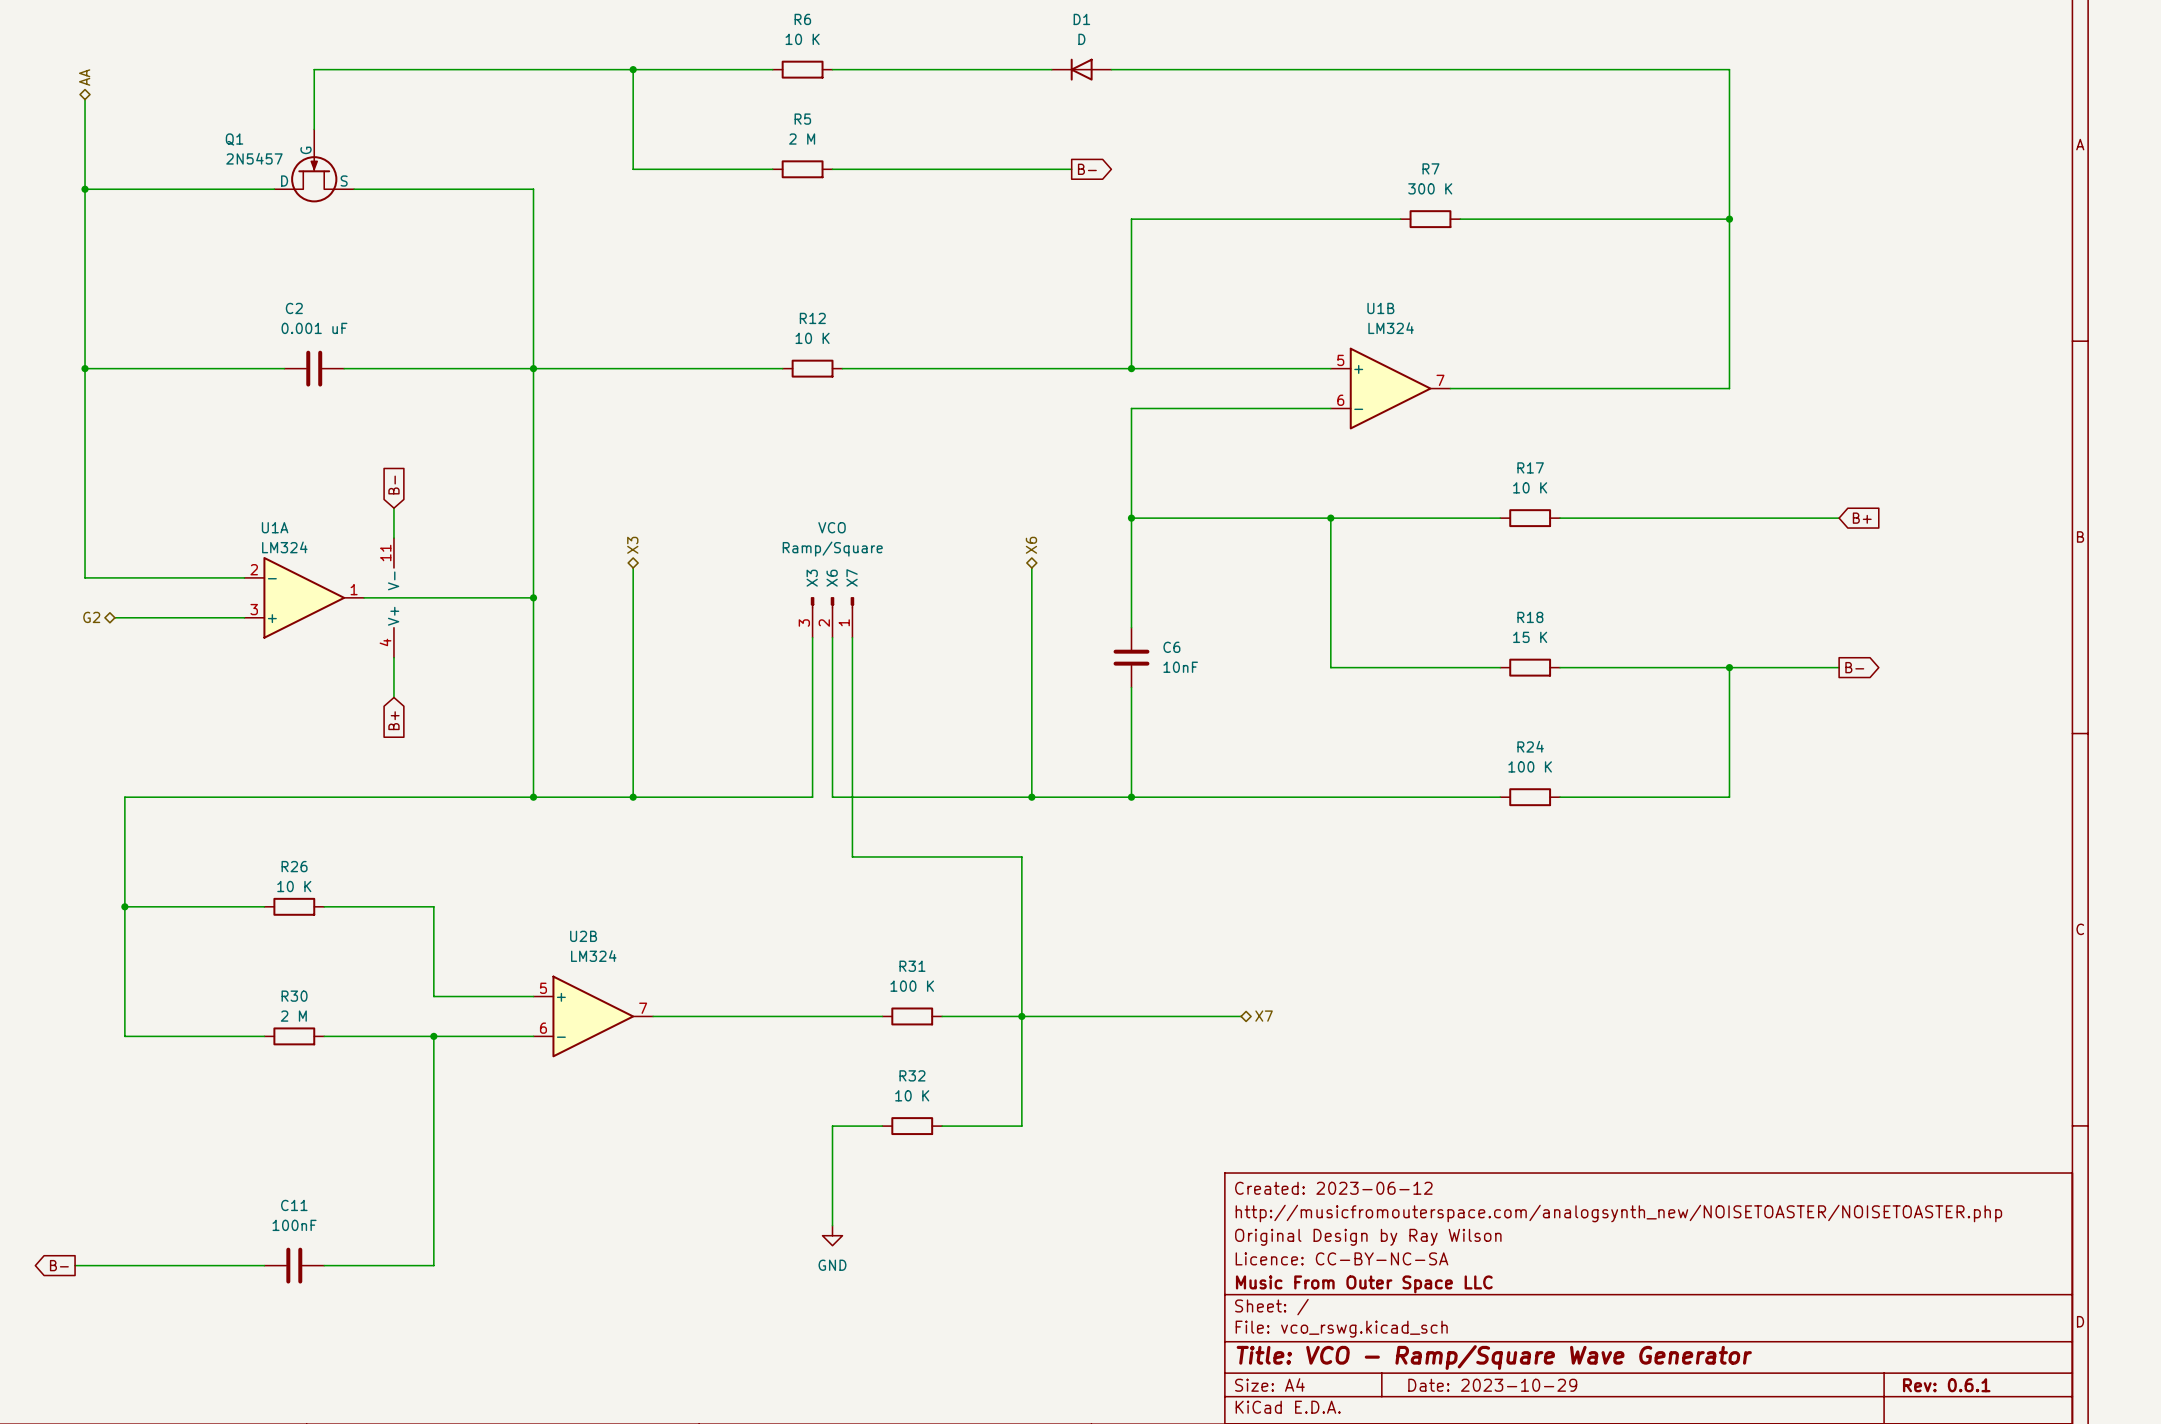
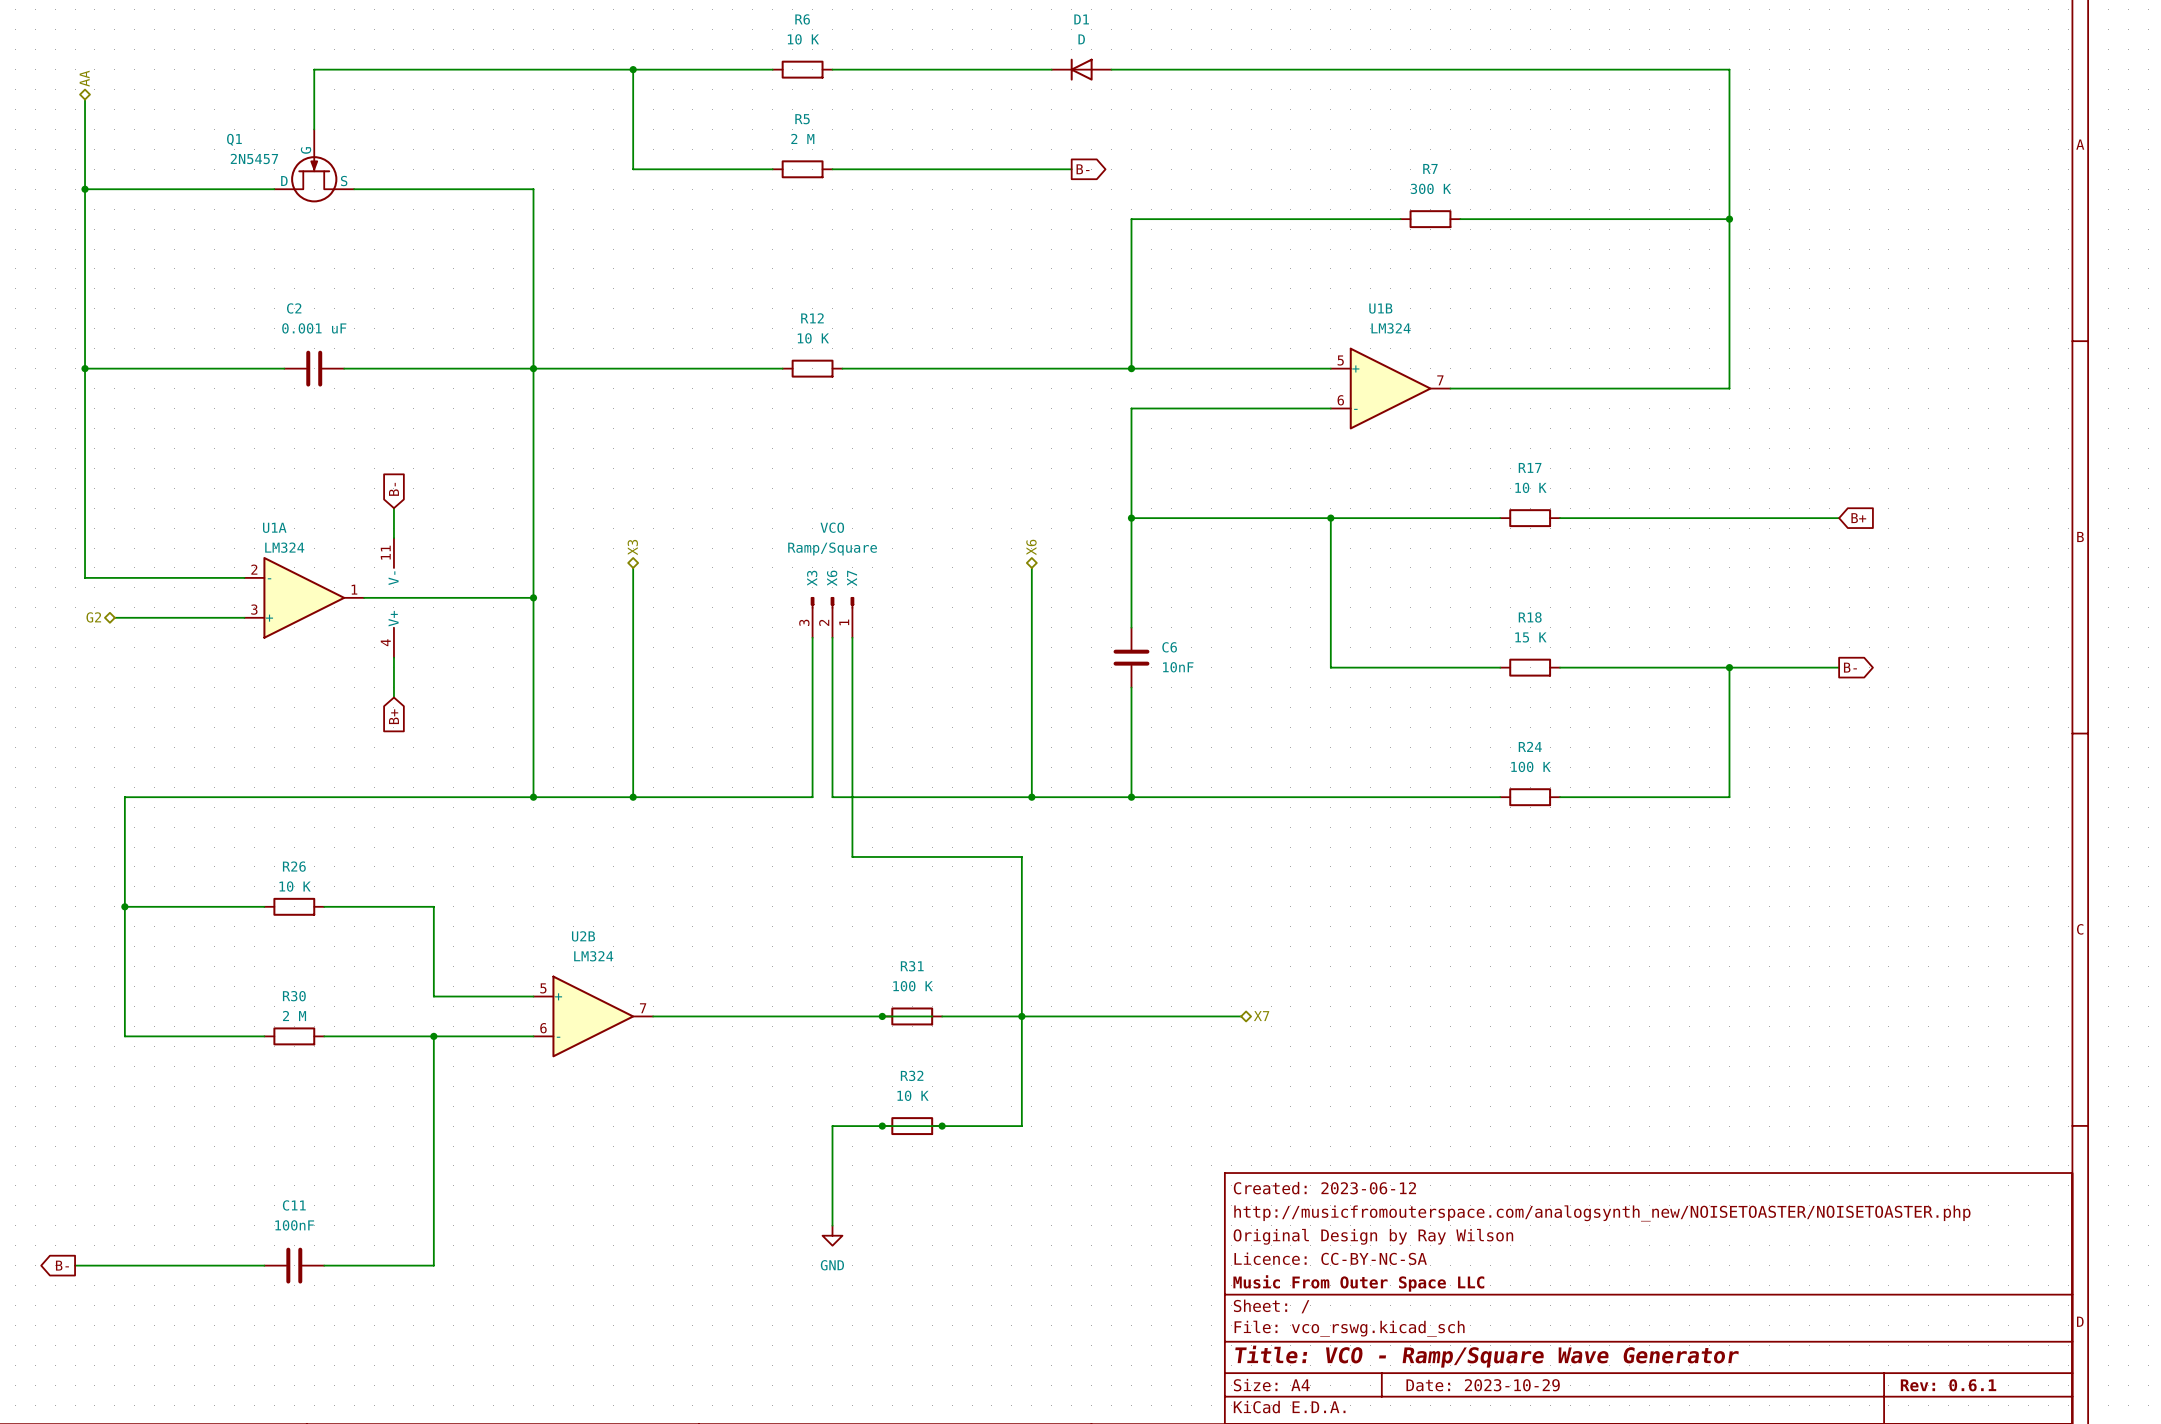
wire: none -> (882, 1016) (932, 1016)
junction: none -> (882, 1016)
wire: none -> (882, 1126) (942, 1126)
junction: none -> (882, 1126)
junction: none -> (942, 1126)

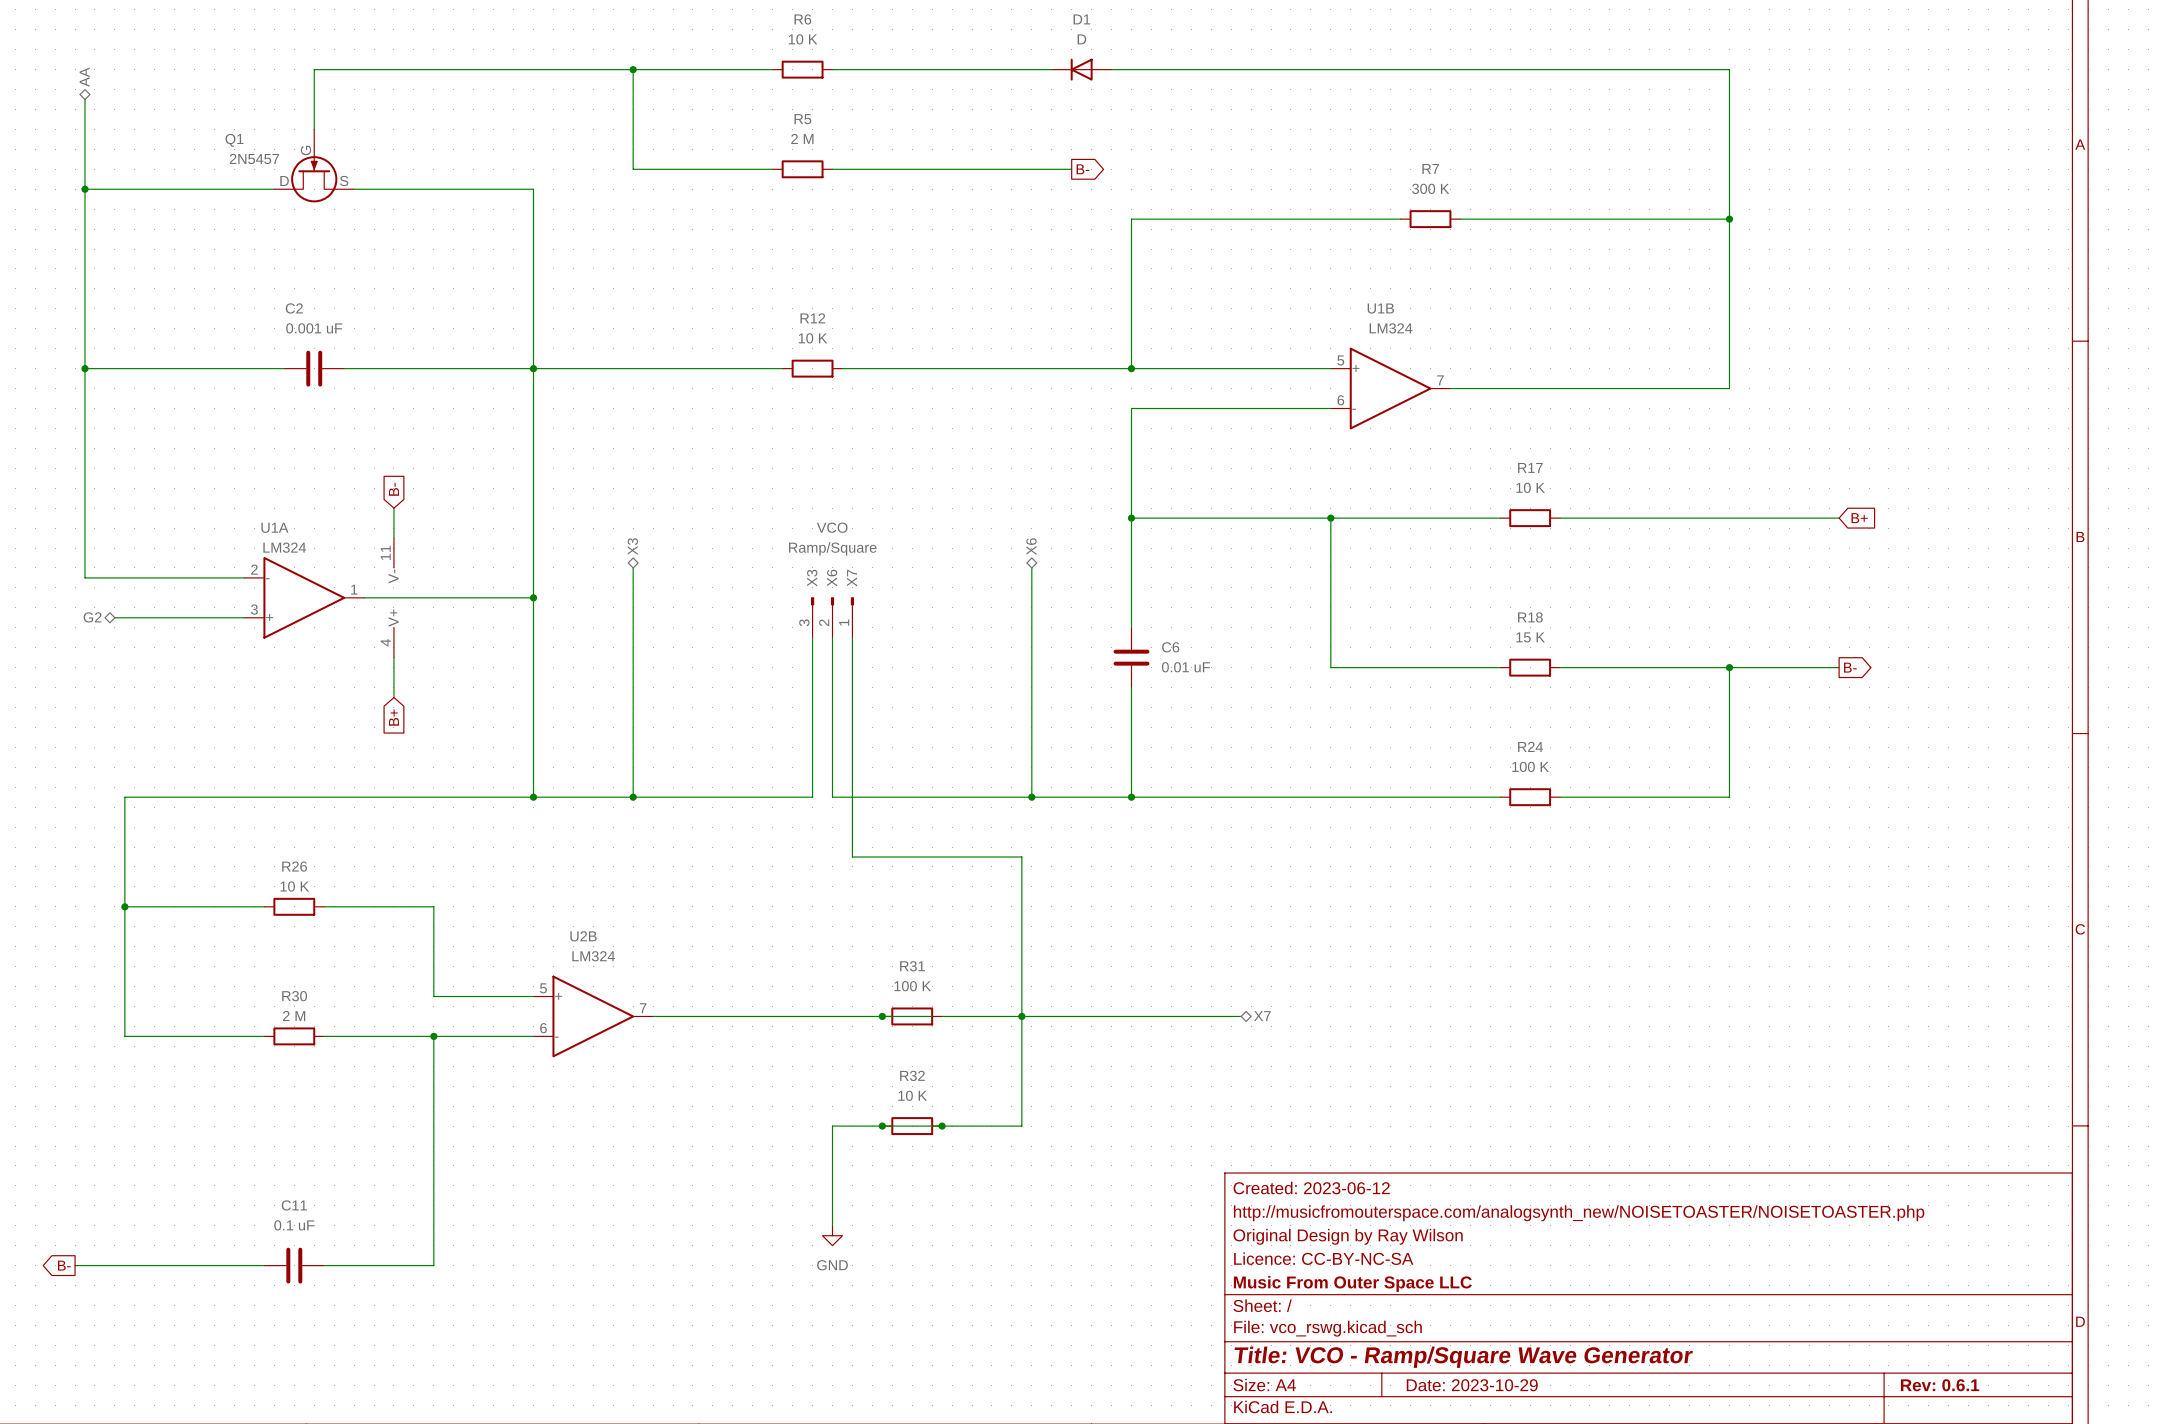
C6 value: 10nF (1178, 667) -> 0.01 uF (1185, 667)
C11 value: 100nF (294, 1225) -> 0.1 uF (294, 1225)

